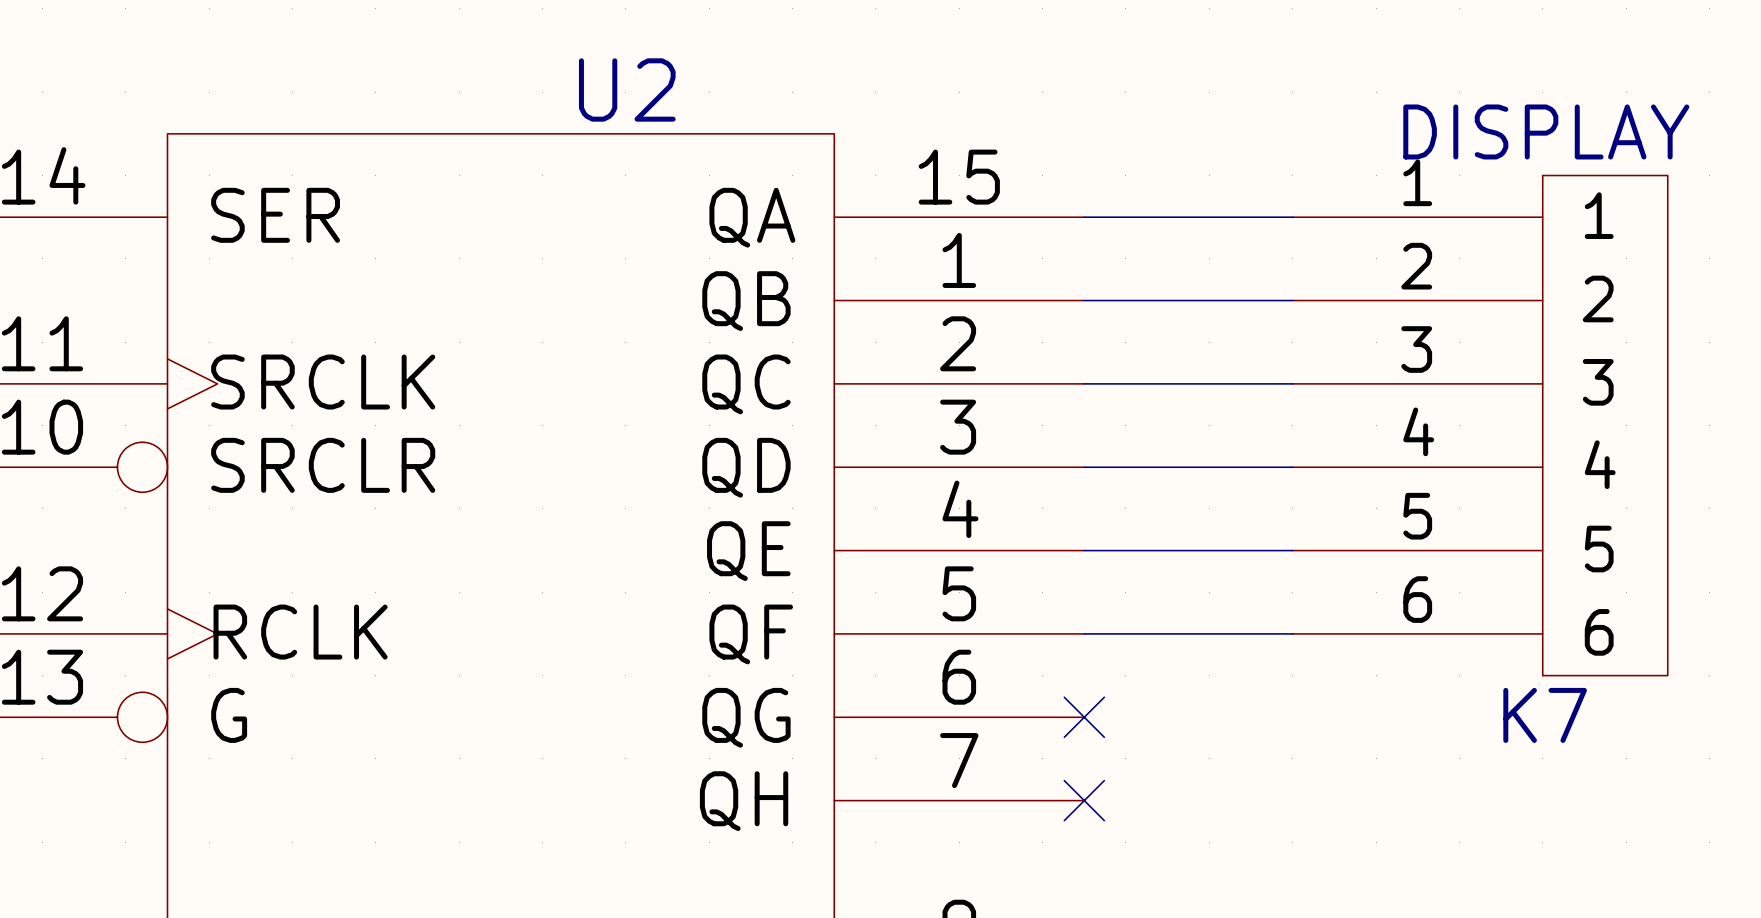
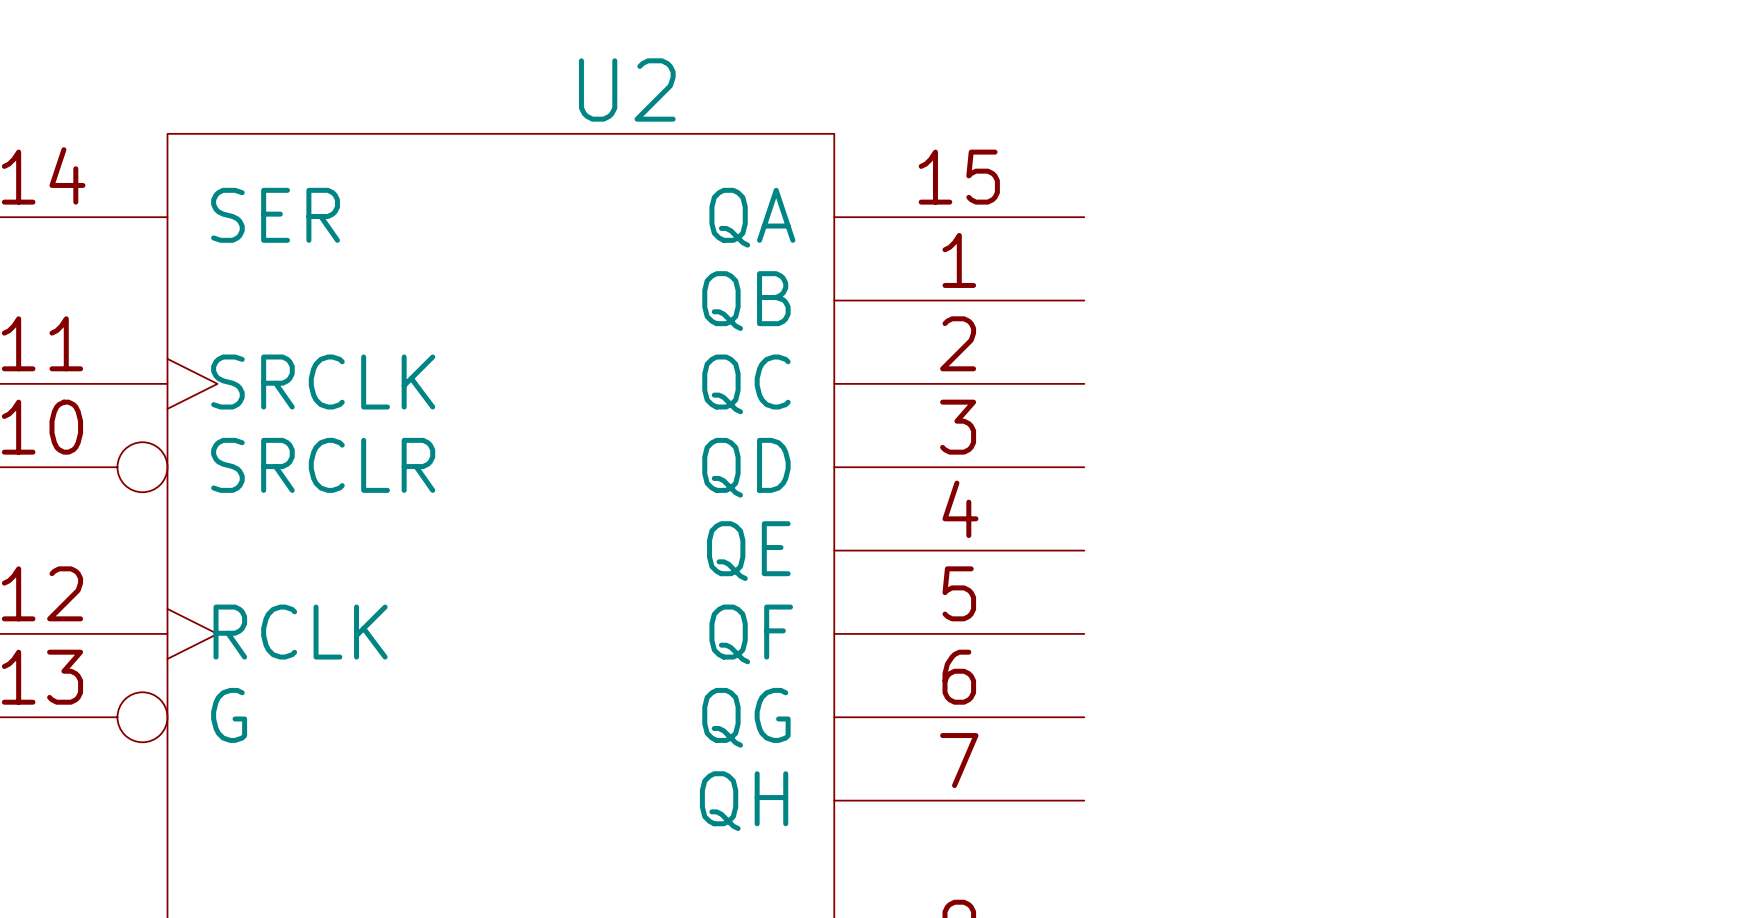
wire: (1084, 217) (1292, 217) -> none
wire: (1084, 300) (1292, 300) -> none
wire: (1084, 383) (1292, 383) -> none
K7: DISPLAY (1480, 425) -> none
wire: (1084, 467) (1292, 467) -> none
wire: (1084, 550) (1292, 550) -> none
wire: (1084, 633) (1292, 633) -> none
no-connect mark: (1084, 717) -> none
no-connect mark: (1084, 800) -> none

